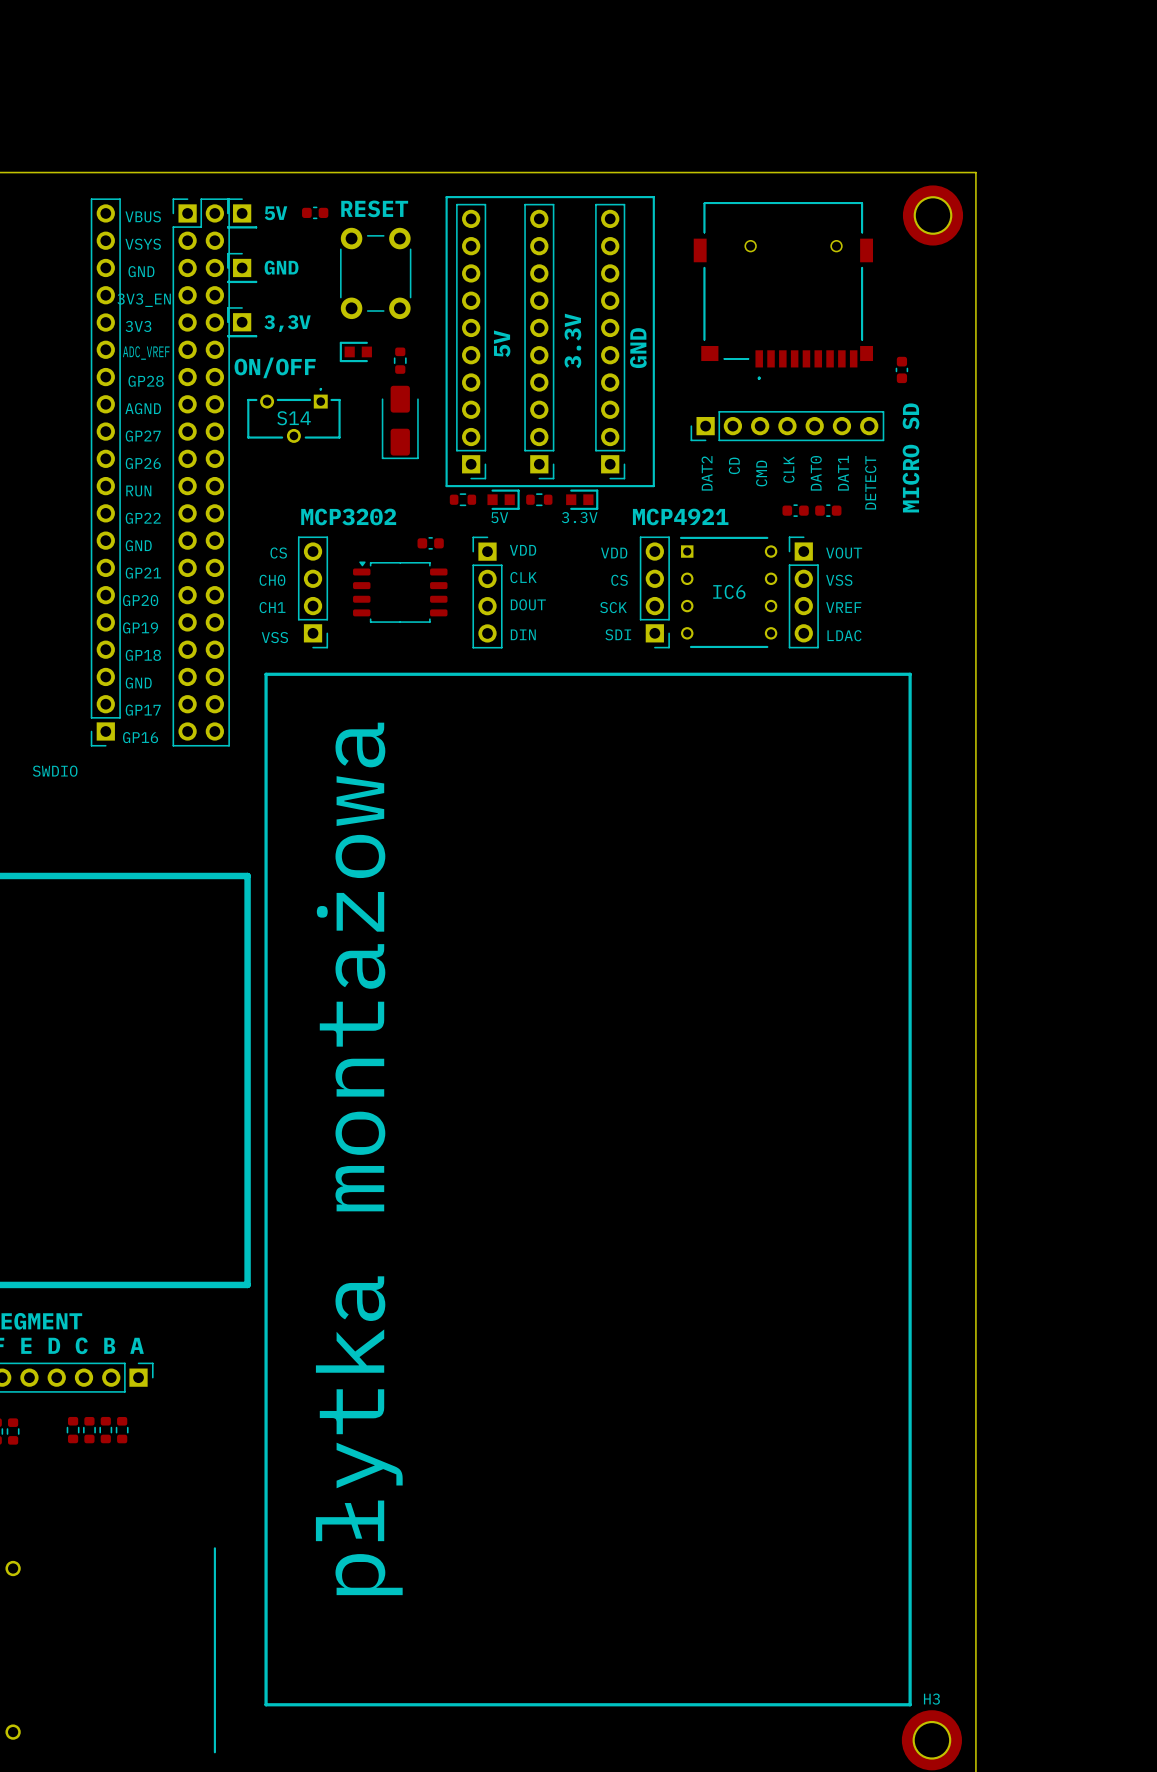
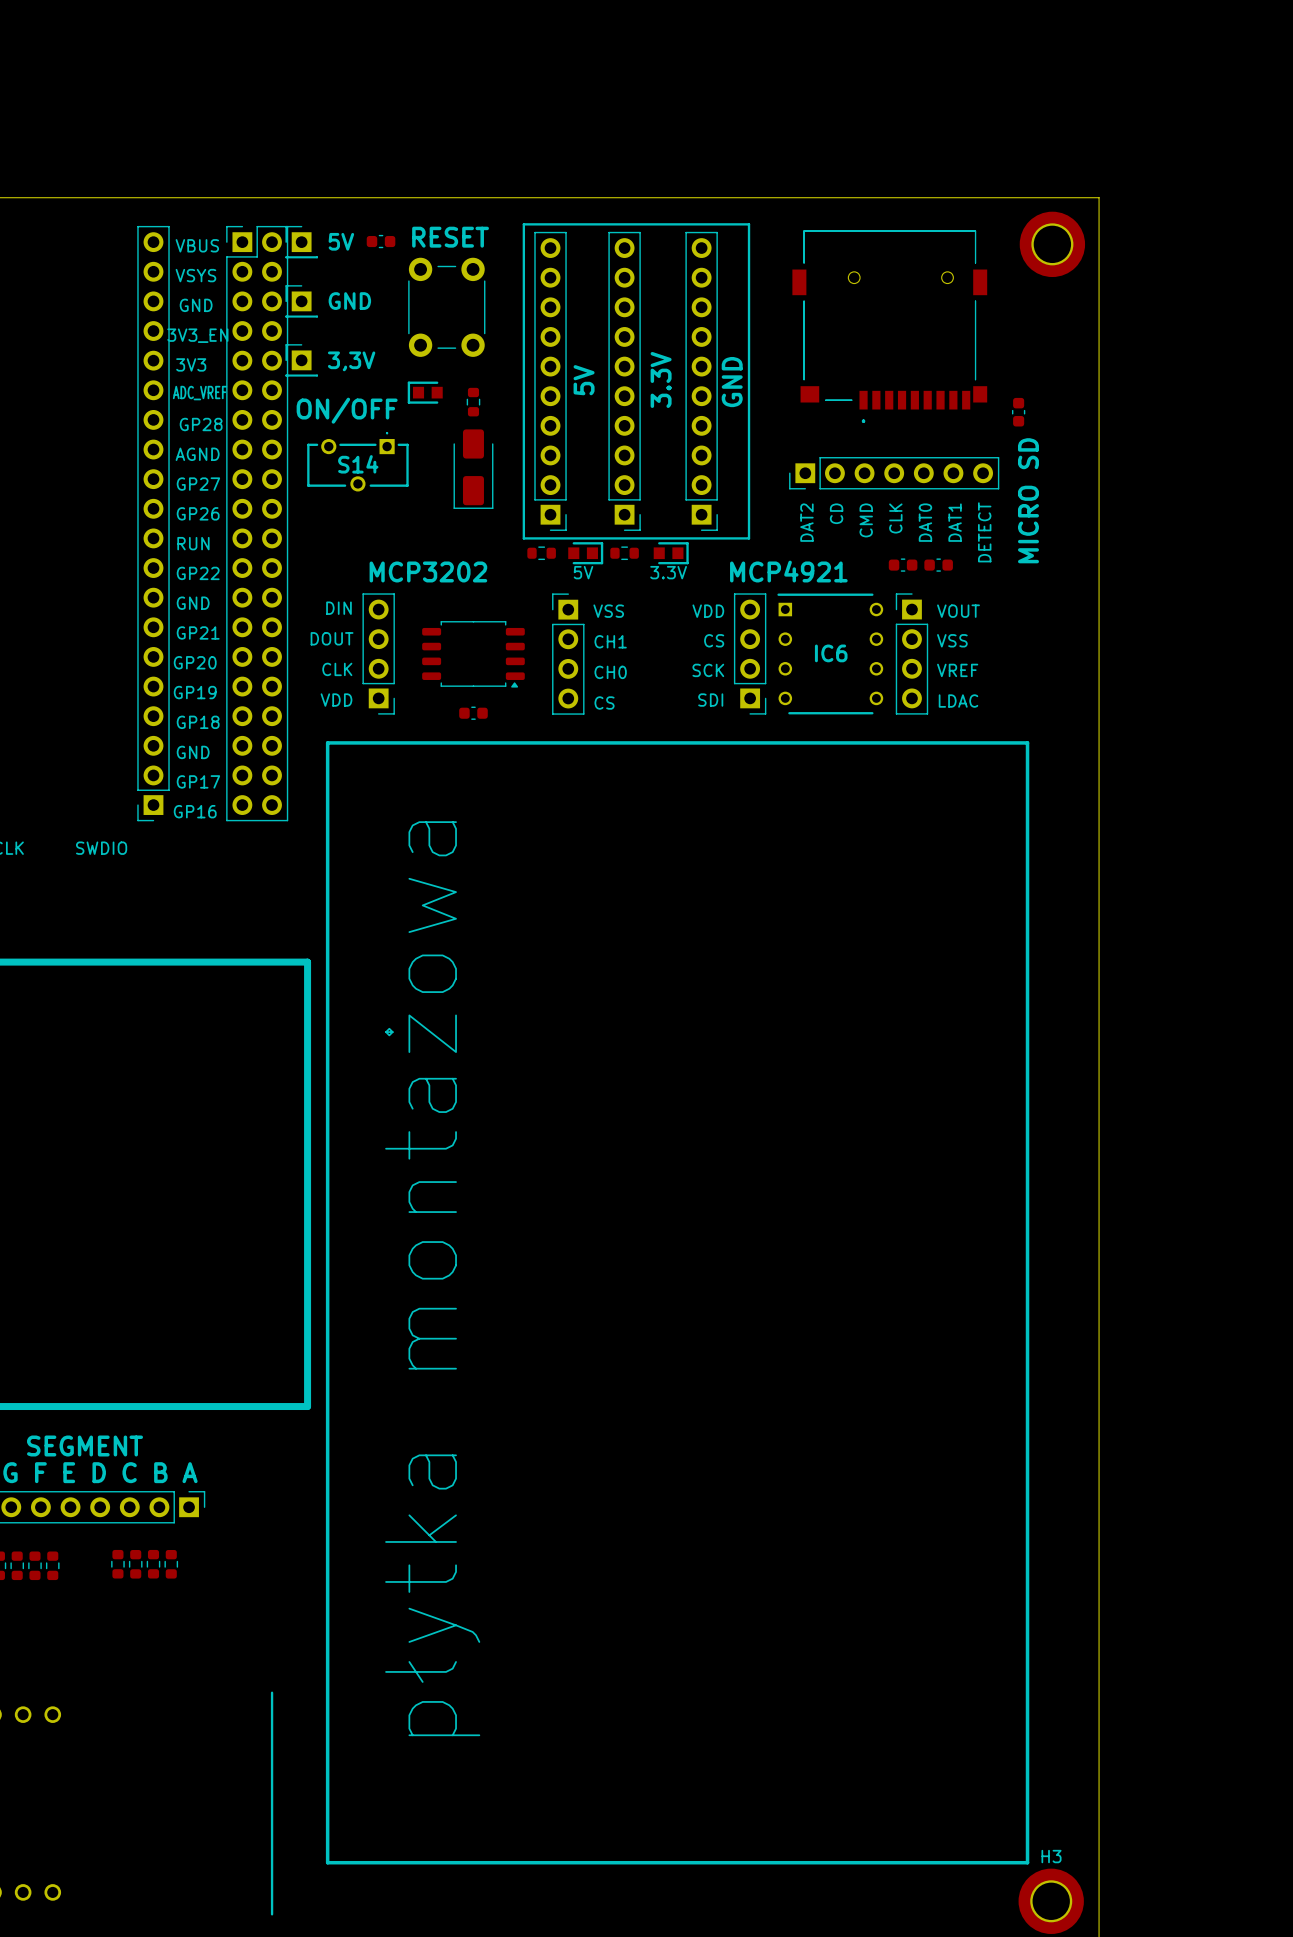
part position: (430, 543) -> (473, 713)
text: VDD (523, 550) -> VSS (608, 611)
text: CS (278, 553) -> DIN (338, 608)
text: CLK (523, 577) -> CH1 (610, 641)
text: none -> DOUT (332, 638)
text: CH0 (272, 580) -> none
part rotation: 0° (400, 592) -> 180° (473, 654)
text: DOUT (528, 604) -> CH0 (610, 672)
text: CH1 (272, 607) -> CLK (337, 669)
text: DIN (523, 634) -> CS (604, 703)
text: VSS (274, 637) -> VDD (336, 700)

